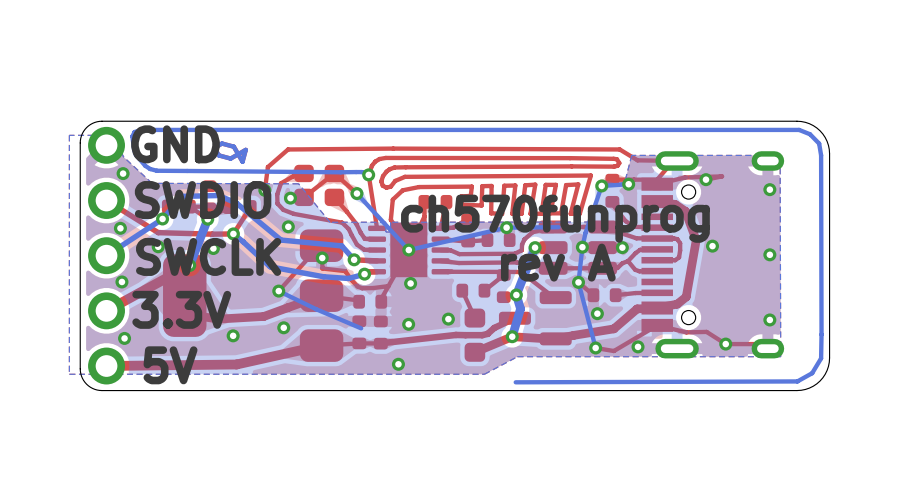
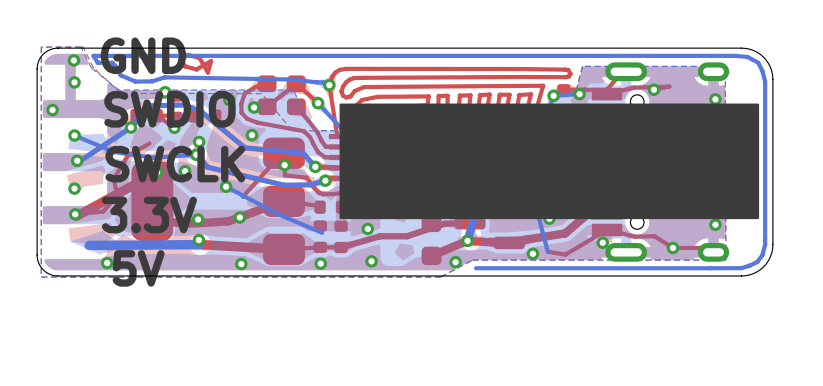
bottom zone outline: (110, 135) (112, 135) (123, 157) (152, 183) (298, 183) (330, 222) (353, 222) -> (81, 47) (91, 67) (118, 89) (293, 89) (315, 130)
bottom track: (222, 143) (233, 146) (242, 161) (245, 149) (230, 158) (218, 155) (214, 147) (222, 143) -> none
via: none -> (73, 60)
top track: (677, 160) (637, 160) (619, 149) (288, 149) (267, 167) (264, 190) -> none
board edge: (829, 169) (829, 149) (822, 133) (813, 125) (796, 121) (97, 121) (86, 127) (80, 140) (80, 368) (81, 376) (86, 384) (92, 388) (101, 390) (796, 390) (813, 386) (825, 374) (829, 362) (829, 340) -> (772, 79) (770, 67) (763, 57) (753, 50) (741, 48) (58, 48) (51, 49) (43, 54) (39, 59) (37, 69) (37, 257) (43, 269) (53, 275) (741, 275) (753, 273) (763, 266) (770, 256) (772, 244)
via: none -> (74, 82)
bottom track: (356, 172) (156, 170) (145, 165) (135, 154) (132, 136) (134, 132) (141, 129) (799, 129) (810, 134) (819, 143) (821, 155) (821, 358) (812, 373) (797, 381) (515, 382) -> (317, 82) (292, 79) (164, 77) (152, 81) (135, 81) (120, 75) (112, 62) (97, 62) (93, 55) (735, 55) (747, 56) (758, 62) (765, 81) (765, 244) (762, 255) (757, 262) (741, 268) (476, 268)
via: (123, 173) -> none
via: none -> (165, 92)
drawing: none -> [339, 103, 760, 220]
via: none -> (52, 110)
top track: (106, 200) (158, 232) (233, 233) (250, 207) -> none
bottom track: (207, 219) (189, 265) -> none
via: none -> (74, 135)
via: (120, 228) -> none
bottom track: (233, 233) (270, 266) (323, 276) (348, 278) -> (74, 135) (113, 152) (152, 157) (196, 154) (207, 167) (284, 185) (310, 184)
top track: none -> (149, 143) (127, 155) (113, 178) (117, 195) (103, 211) (75, 214)
via: (158, 246) -> none
via: none -> (196, 154)
via: (213, 248) -> none
via: none -> (77, 160)
part: (106, 255) -> none
via: none -> (185, 171)
via: none -> (226, 186)
via: (121, 281) -> none
via: none -> (74, 188)
bottom track: (278, 291) (316, 309) -> (226, 186) (278, 214)
via: (278, 291) -> none
via: none -> (75, 214)
via: none -> (239, 217)
via: none -> (198, 219)
top track: (513, 318) (482, 335) (455, 334) (379, 343) -> none
top track: none -> (470, 223) (444, 223) (407, 236) (379, 236) (341, 247)
via: (448, 319) -> none
via: (283, 327) -> none
via: (124, 338) -> none
bottom track: none -> (200, 244) (89, 245)
top track: (321, 345) (236, 364) (106, 366) -> (284, 249) (200, 244)
via position: (638, 346) -> (602, 242)
via position: (595, 347) -> (532, 253)
via: none -> (455, 262)
via: none -> (107, 263)
via: none -> (241, 264)
via: none -> (320, 263)
via position: (398, 364) -> (371, 261)

